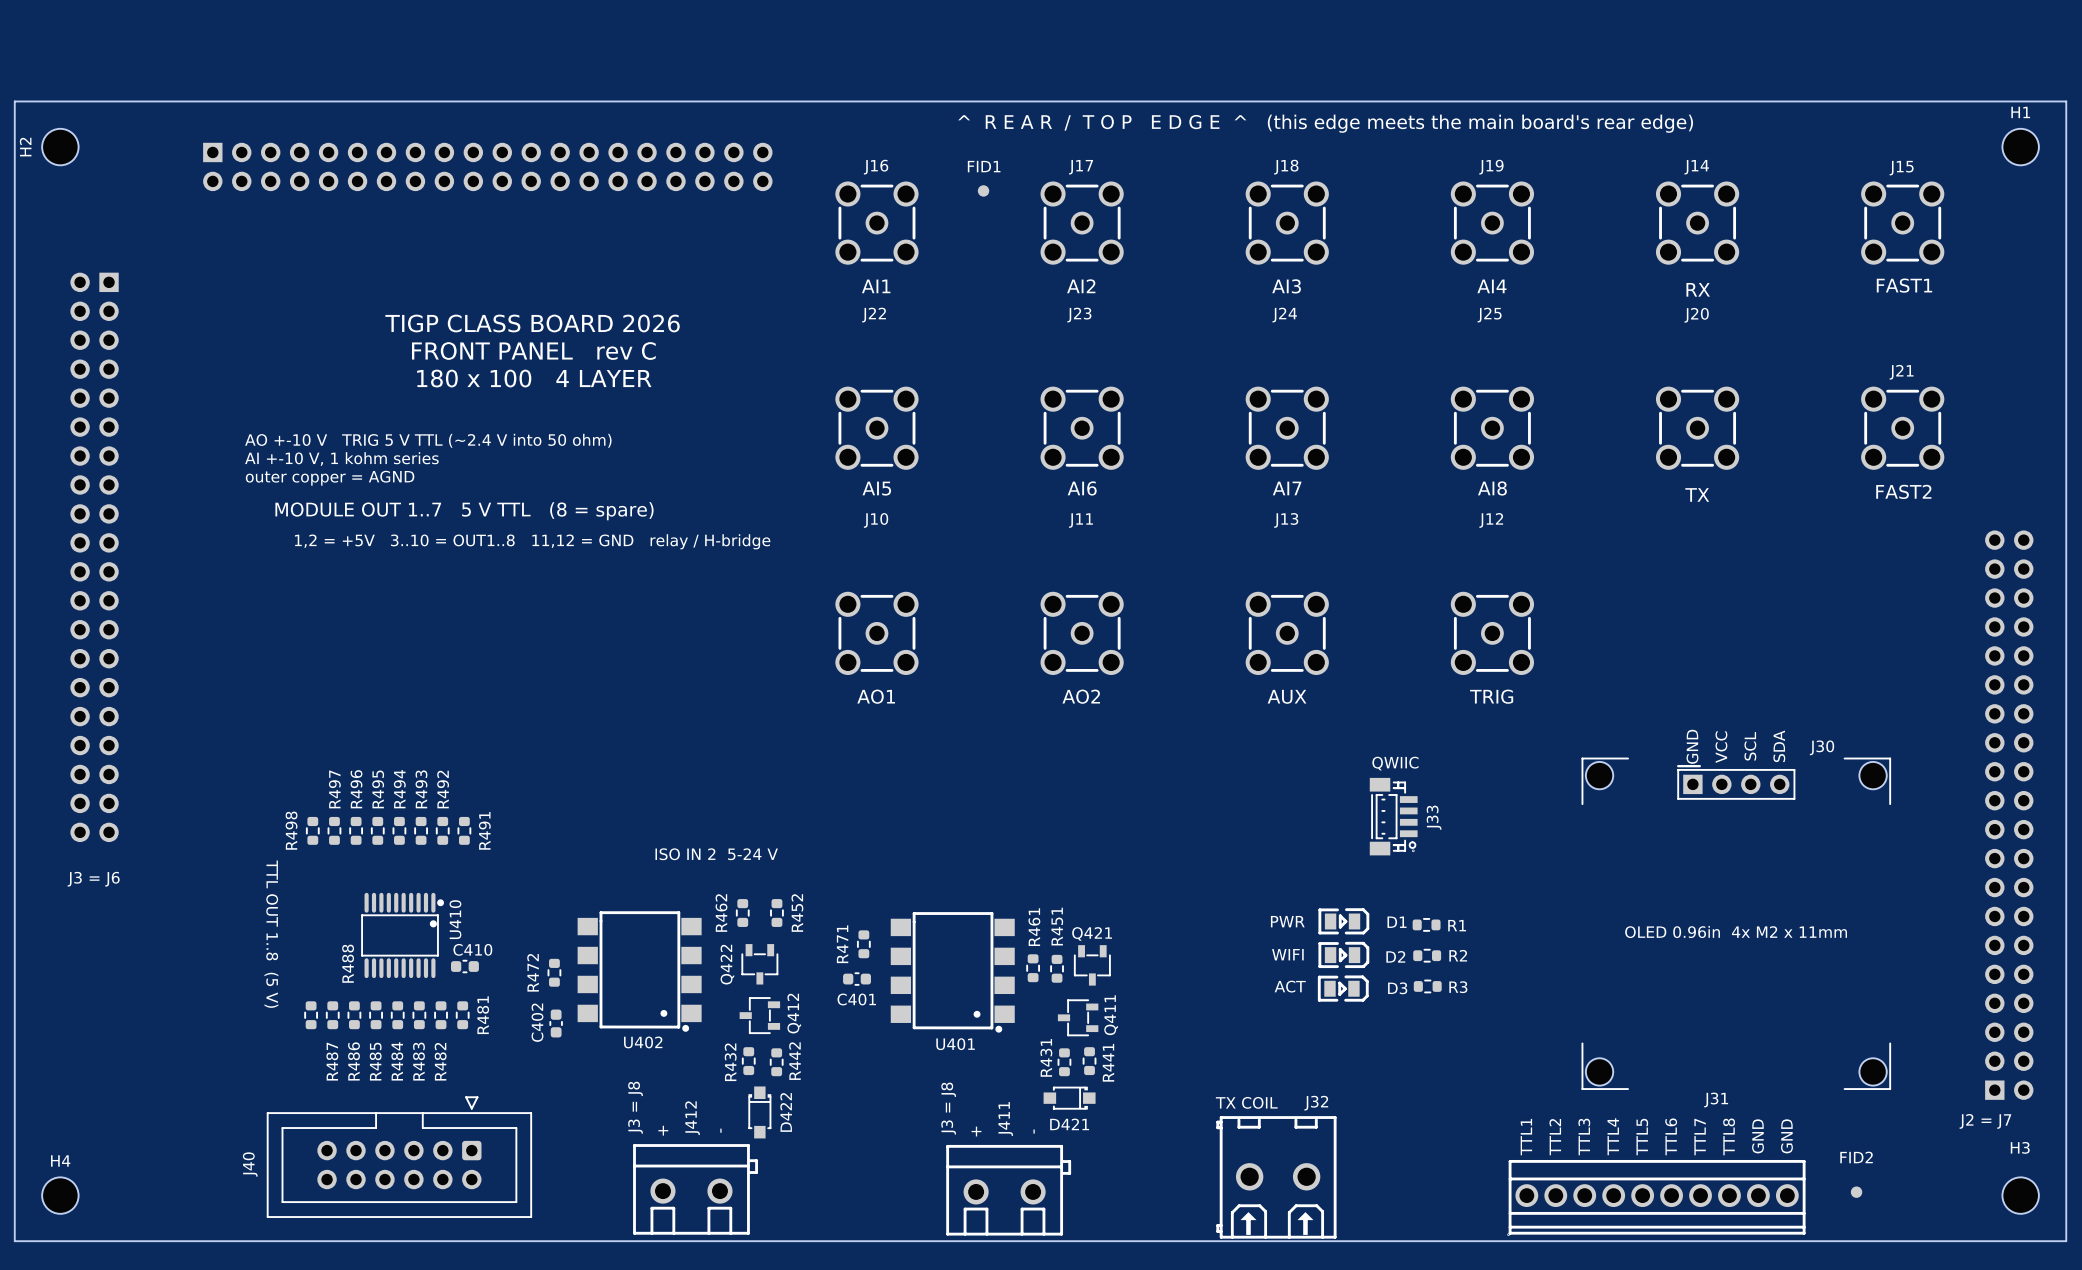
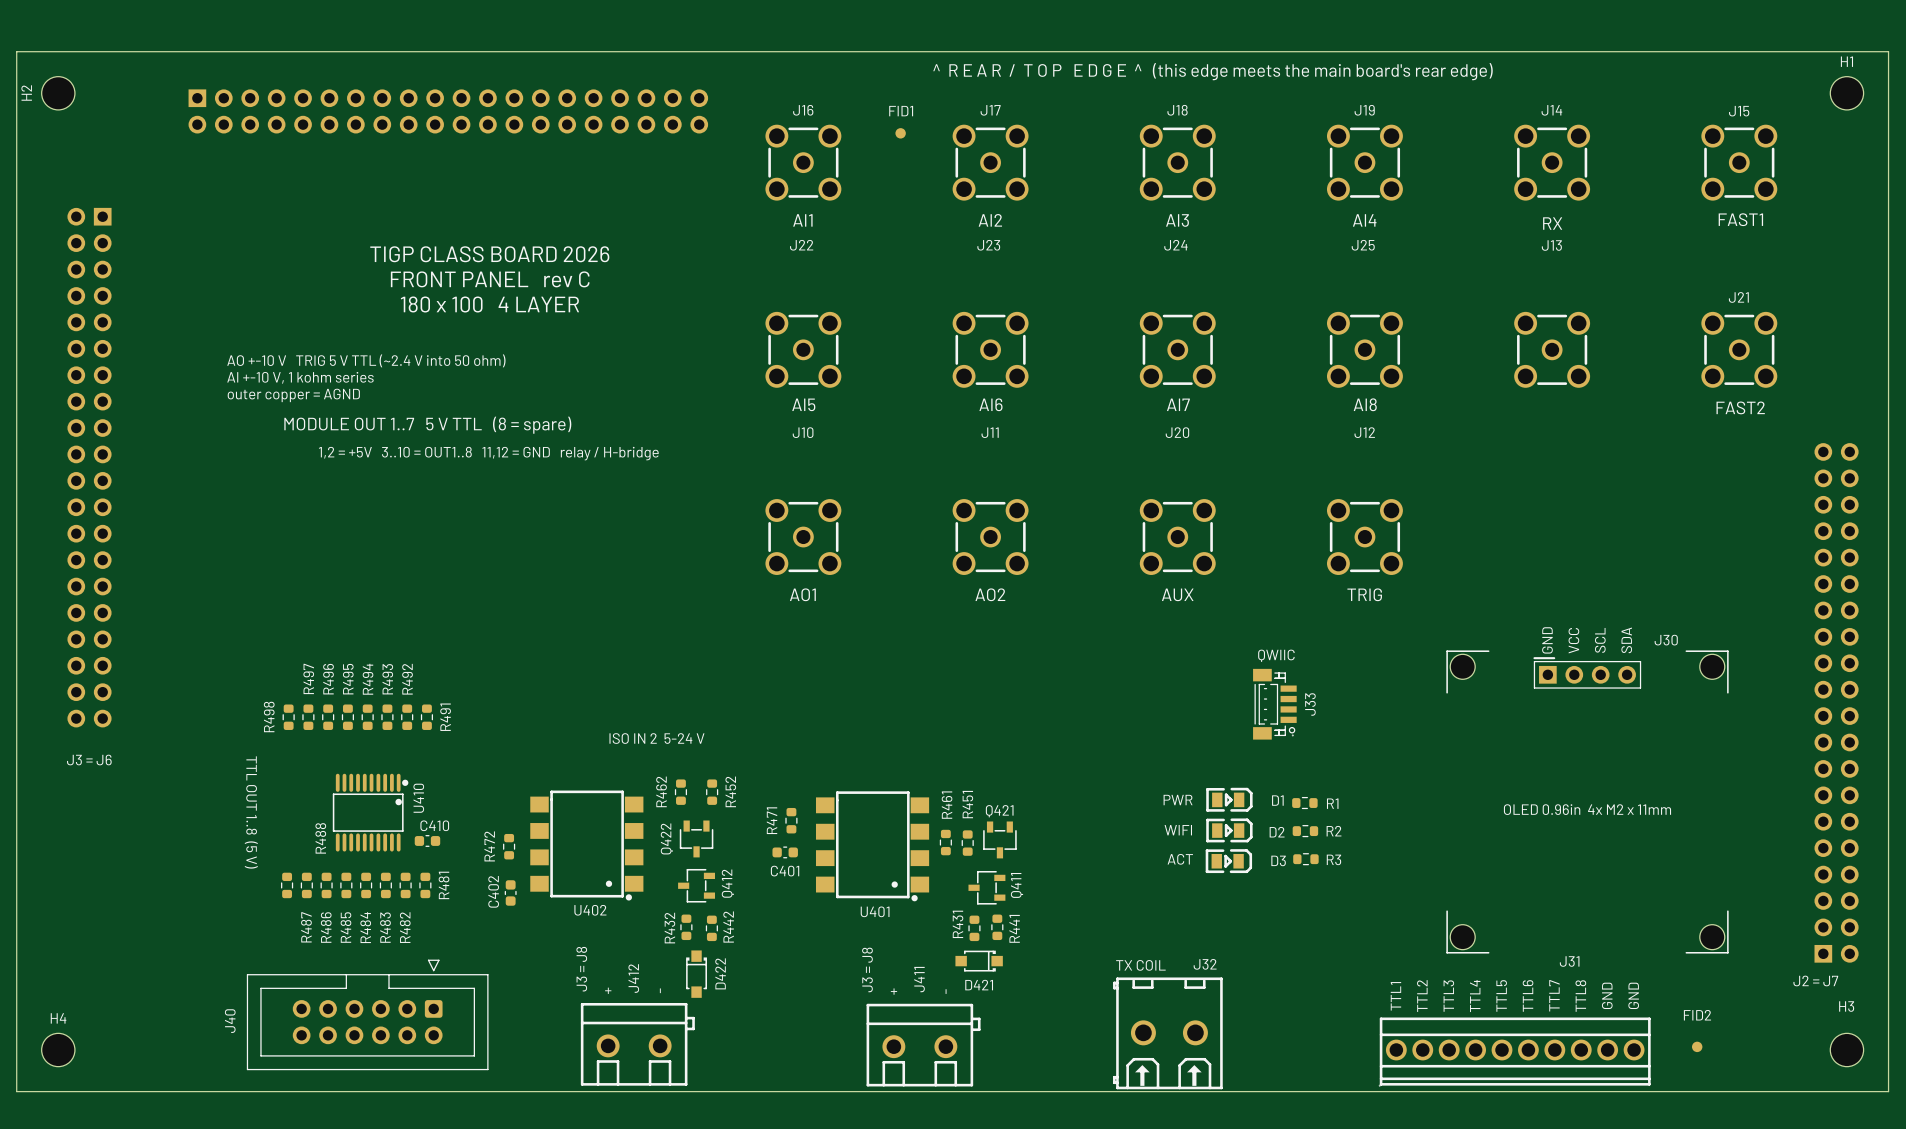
J20 name: J20 (1696, 315) -> J13 (1551, 245)
text: TX (1697, 494) -> none
J13 name: J13 (1286, 520) -> J20 (1177, 432)

